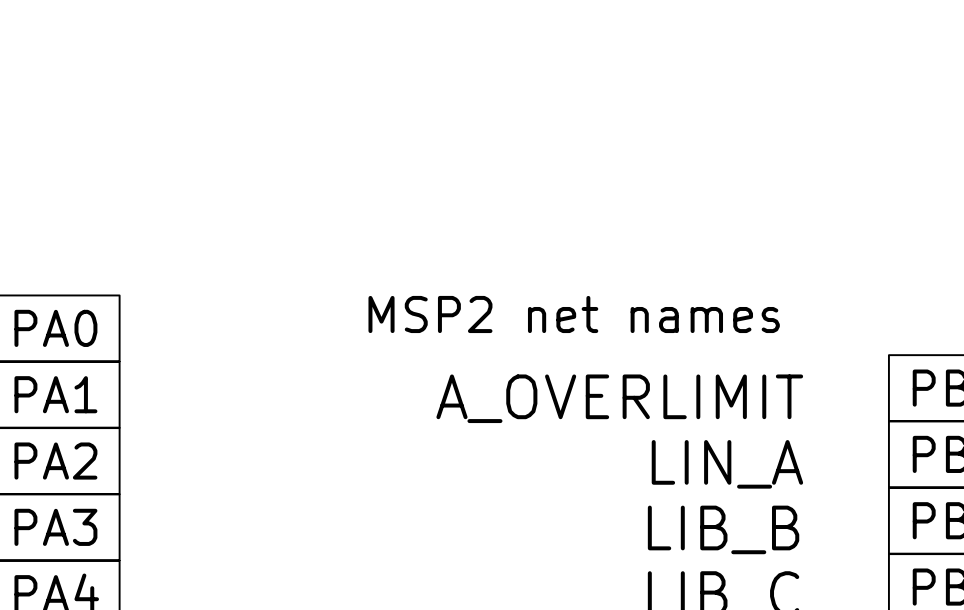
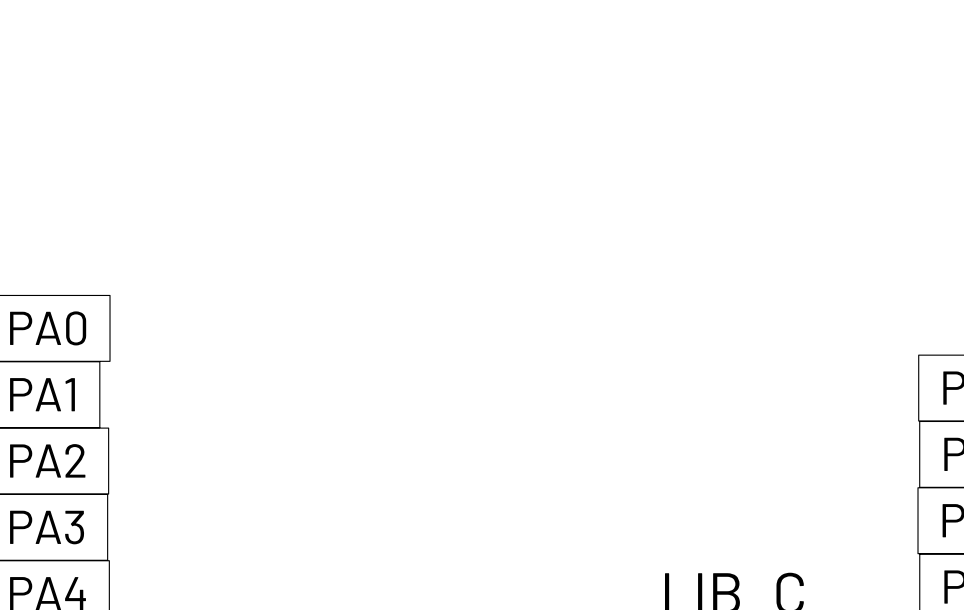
text: MSP2 net names (574, 314) -> none
text: A_OVERLIMIT (619, 398) -> none
text: LIN_A (727, 464) -> none
text: LIB_B (723, 529) -> none

